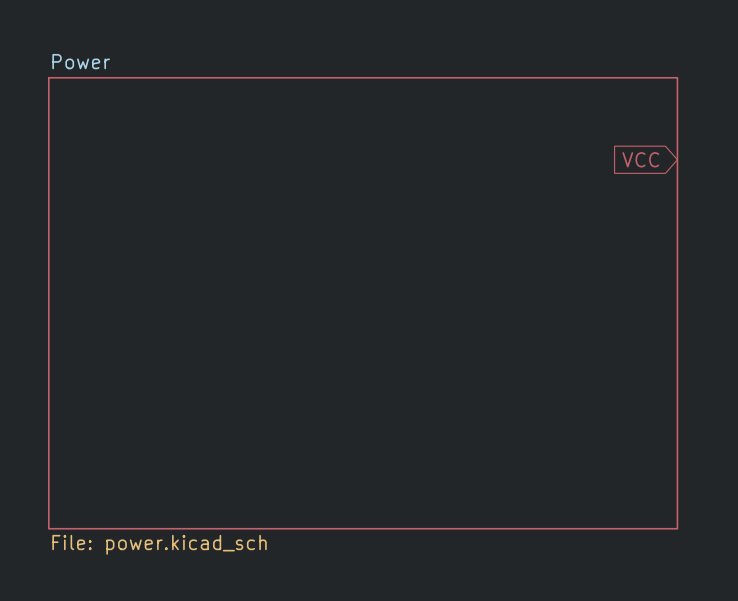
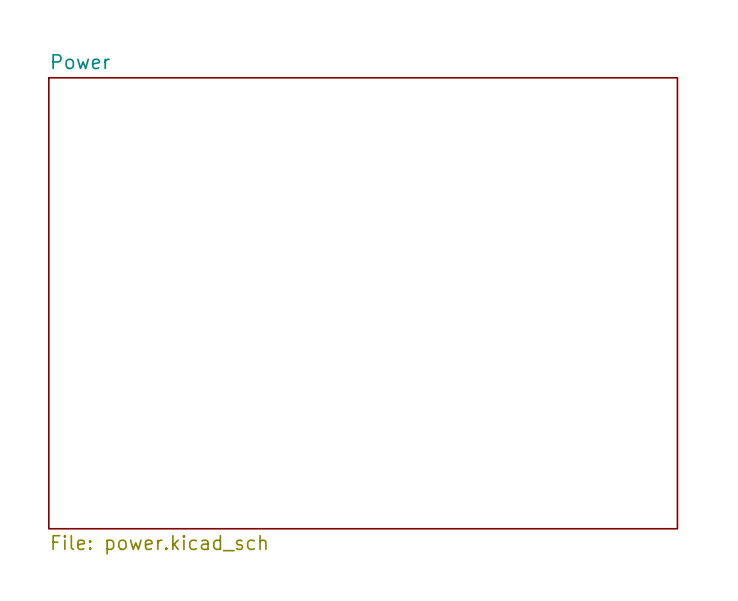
global label: VCC (640, 159) -> none

